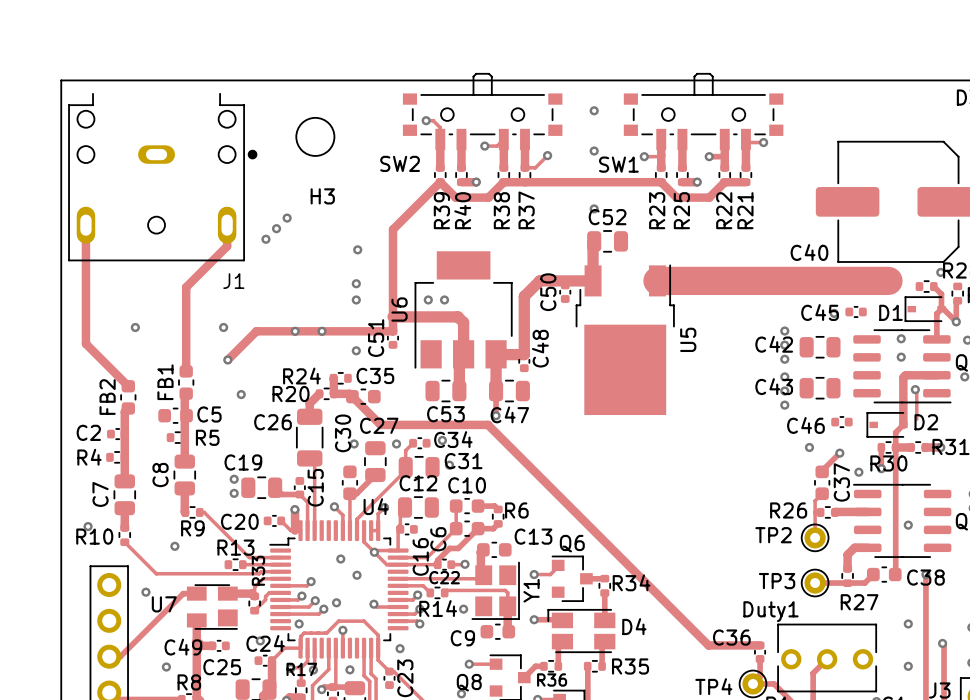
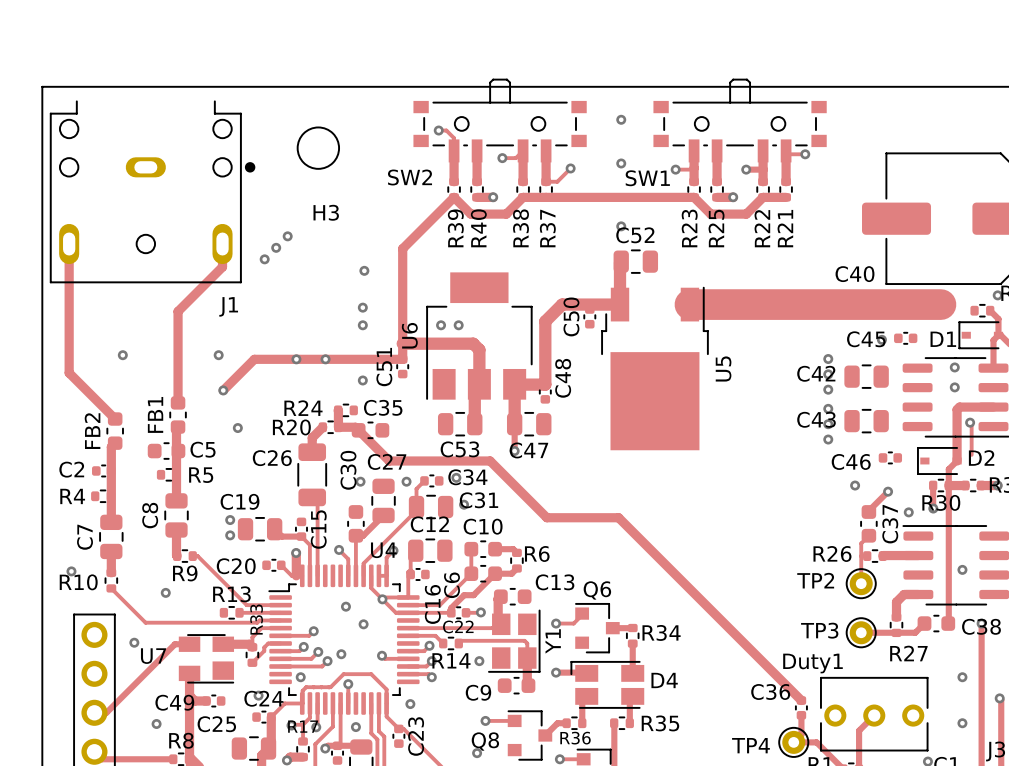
track: (473, 424) (488, 424) (708, 645) (760, 645) -> (490, 461) (546, 517) (618, 517) (801, 700)

